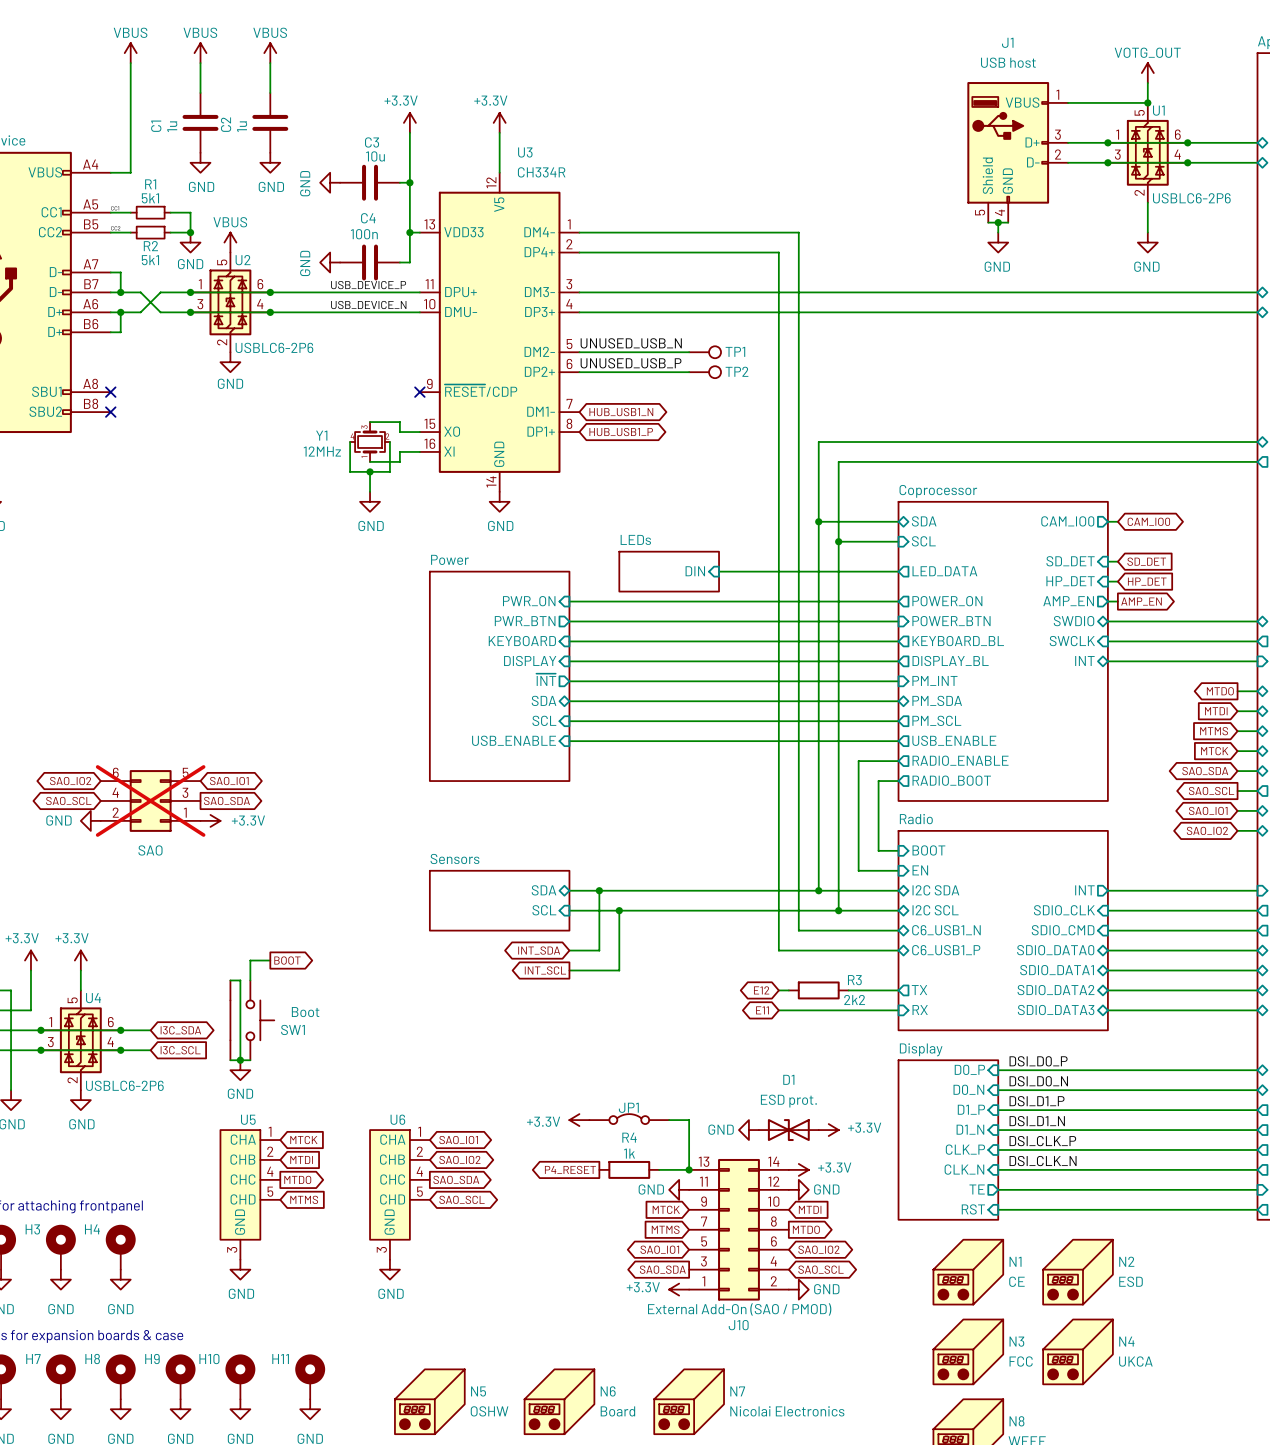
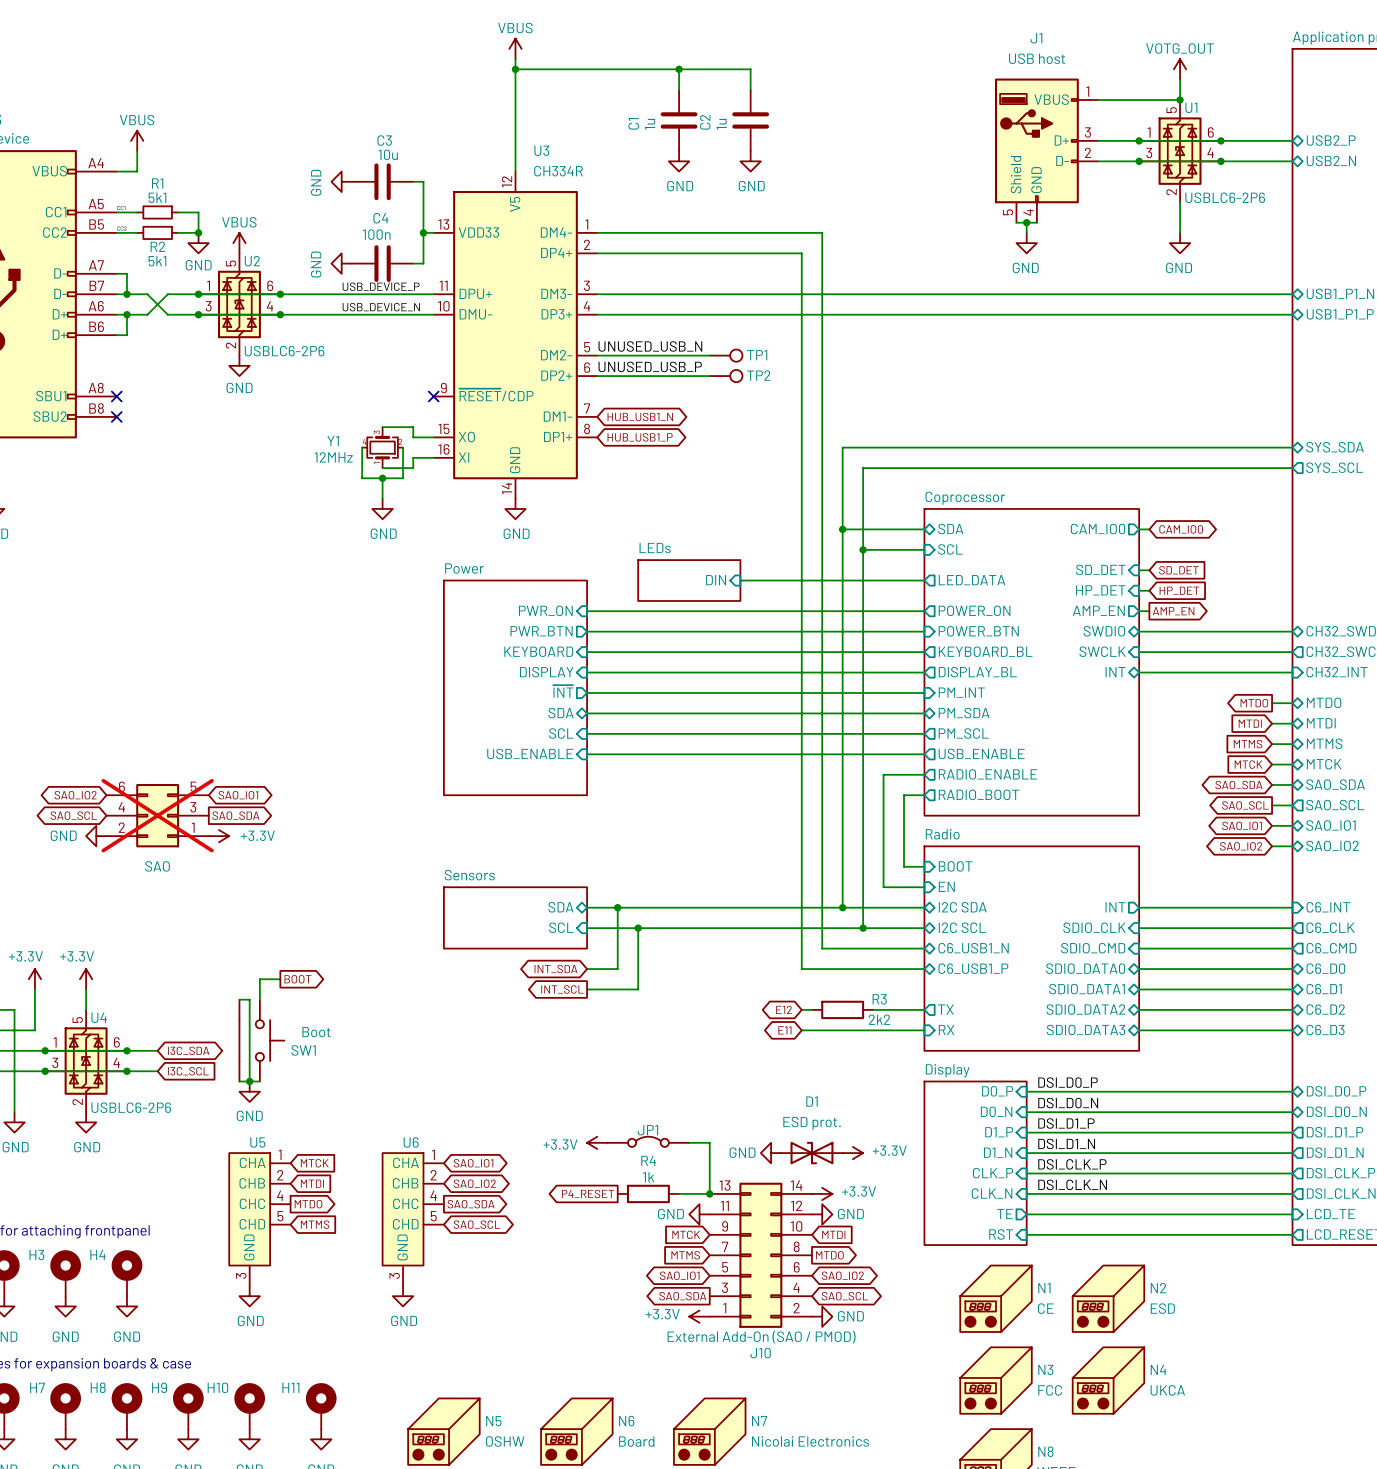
power symbol: VBUS (130, 53) -> none
power symbol: VBUS (200, 53) -> none
power symbol: VBUS (270, 53) -> none
power symbol: none -> VBUS (515, 48)
wire: (130, 63) (130, 152) -> none
wire: (200, 63) (200, 92) -> none
wire: (270, 63) (270, 92) -> none
wire: none -> (515, 59) (515, 130)
wire: none -> (515, 69) (750, 69) (750, 89)
junction: none -> (515, 69)
wire: none -> (679, 69) (679, 89)
junction: none -> (679, 69)
C1 position: (200, 122) -> (679, 120)
C2 position: (270, 122) -> (750, 120)
power symbol: +3.3V (409, 122) -> none
power symbol: +3.3V (499, 122) -> none
wire: (409, 132) (409, 182) -> none
power symbol: none -> VBUS (137, 140)
power symbol: GND (200, 162) -> none
power symbol: GND (270, 162) -> none
power symbol: none -> GND (679, 161)
power symbol: none -> GND (750, 161)
junction: (409, 182) -> none

